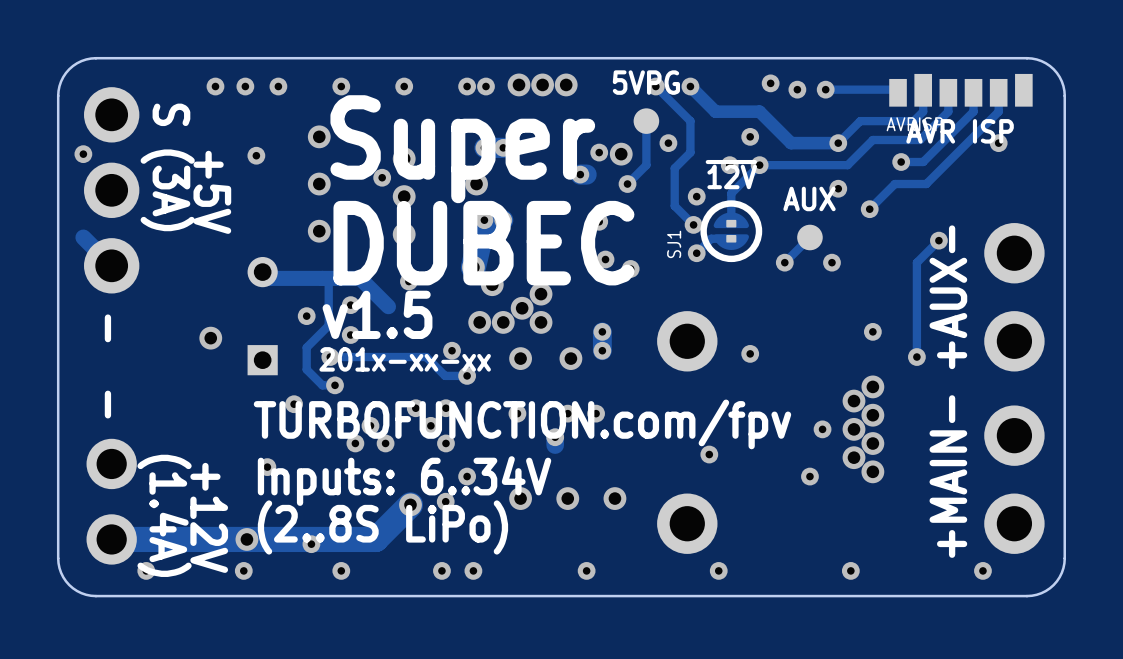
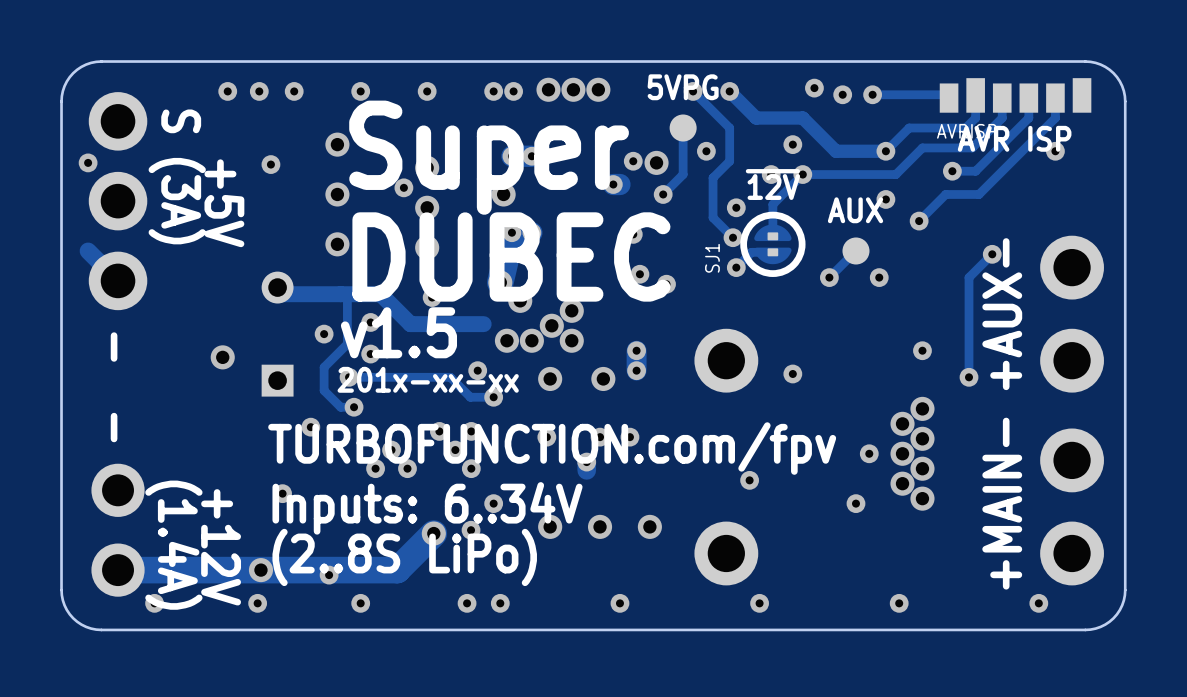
track: none -> (483, 324) (410, 324)

